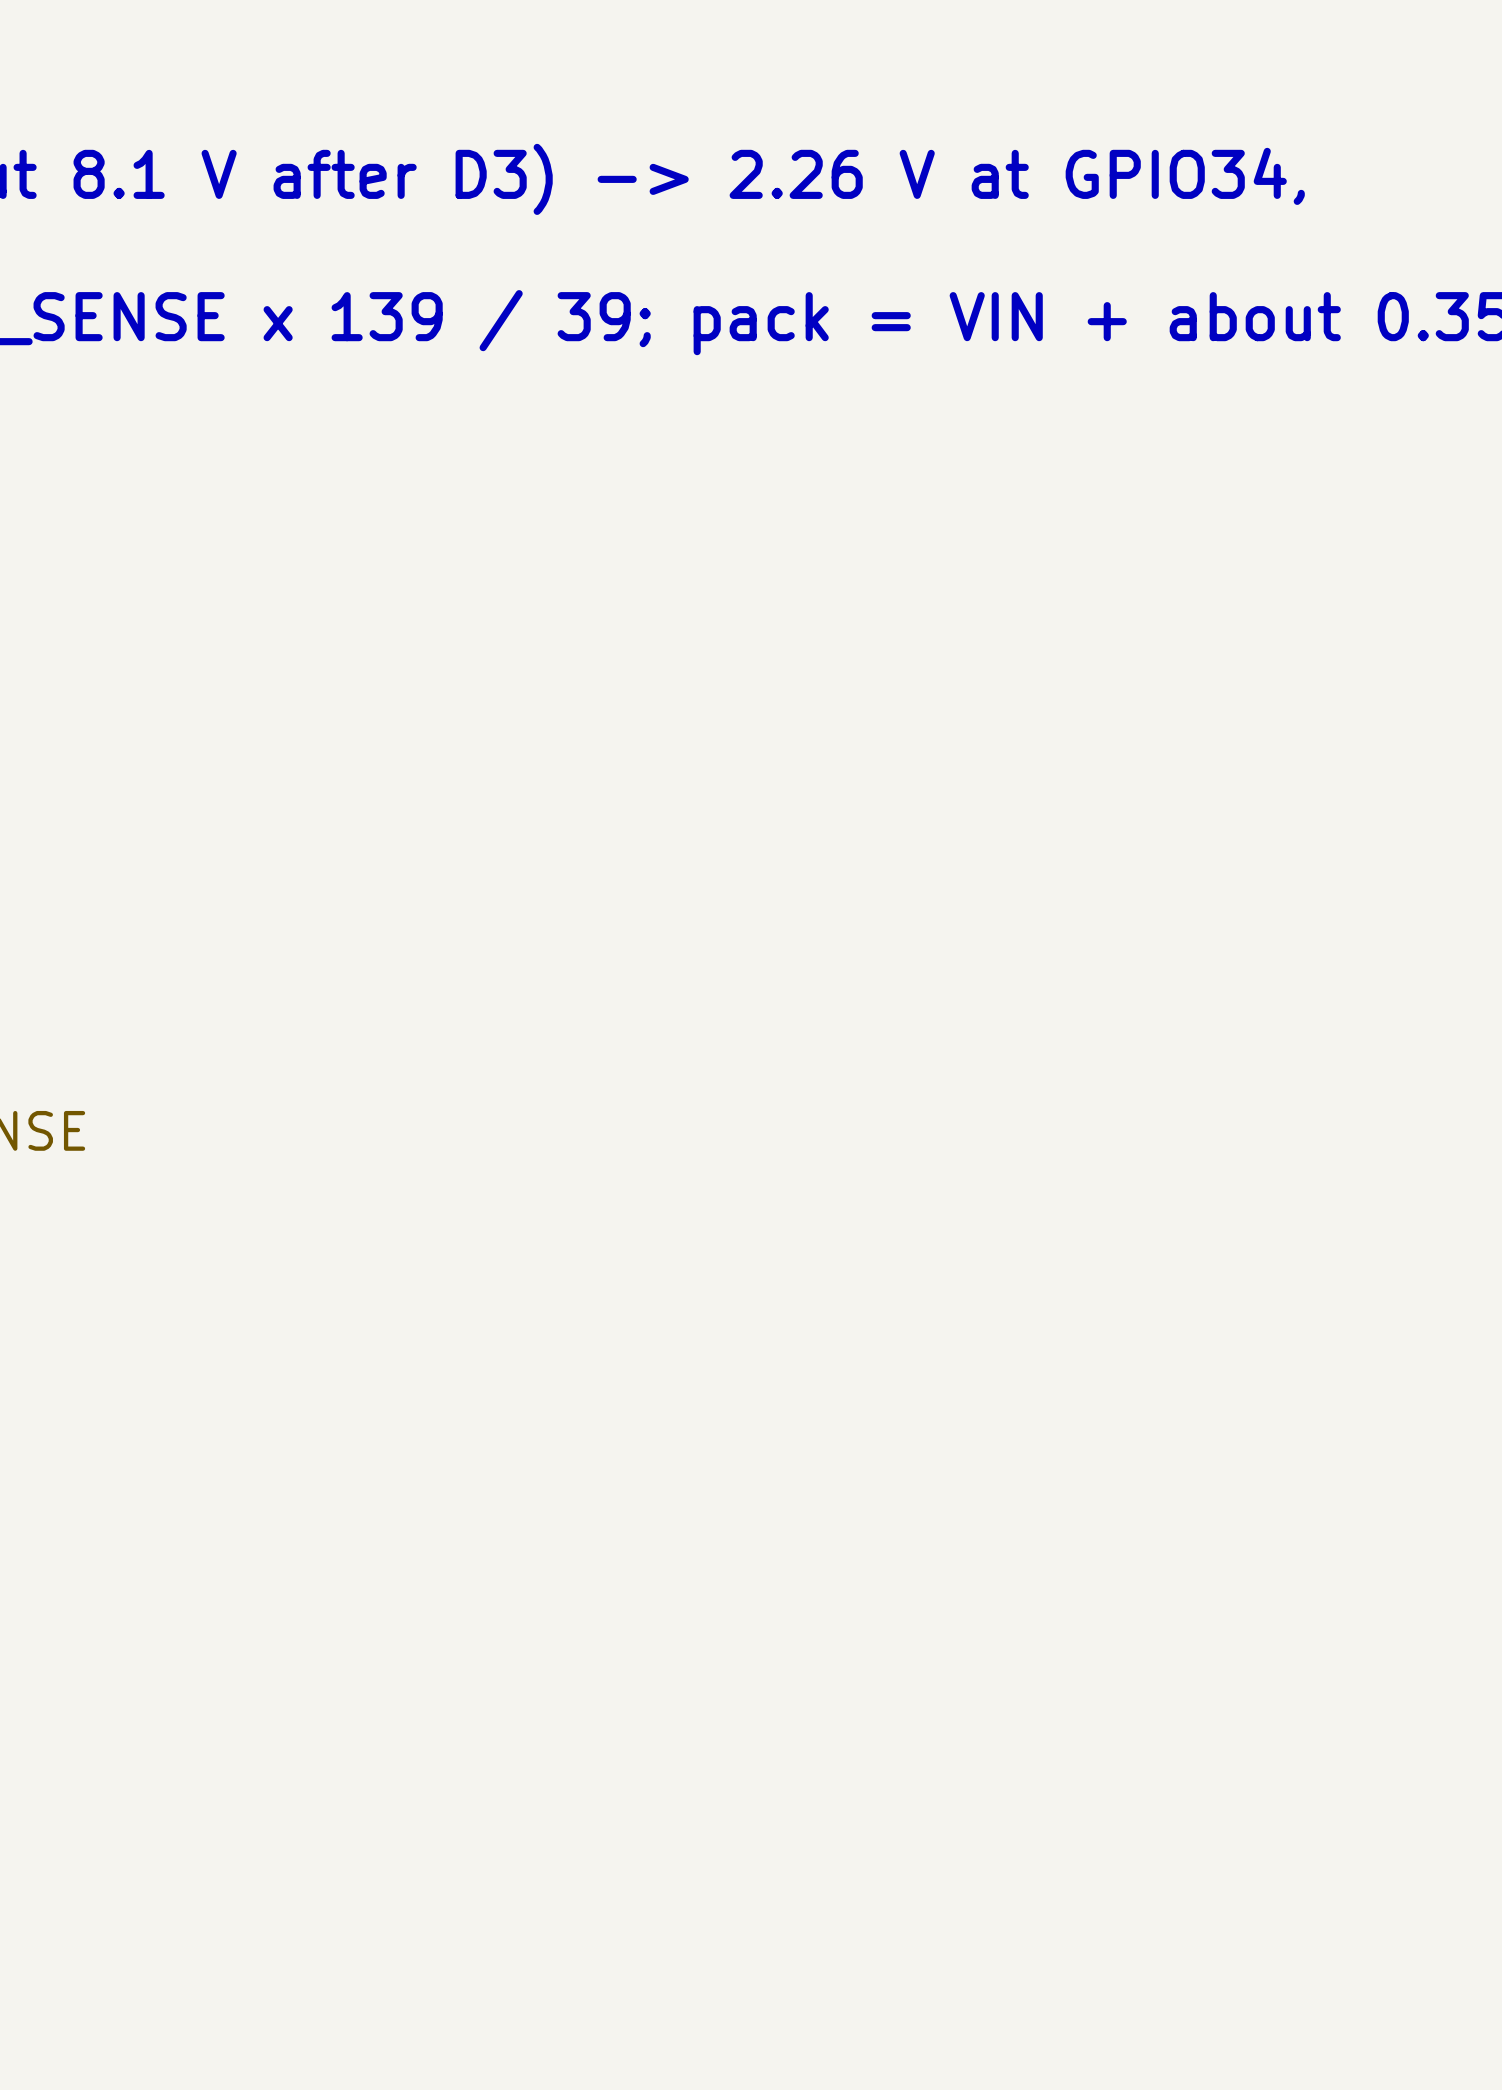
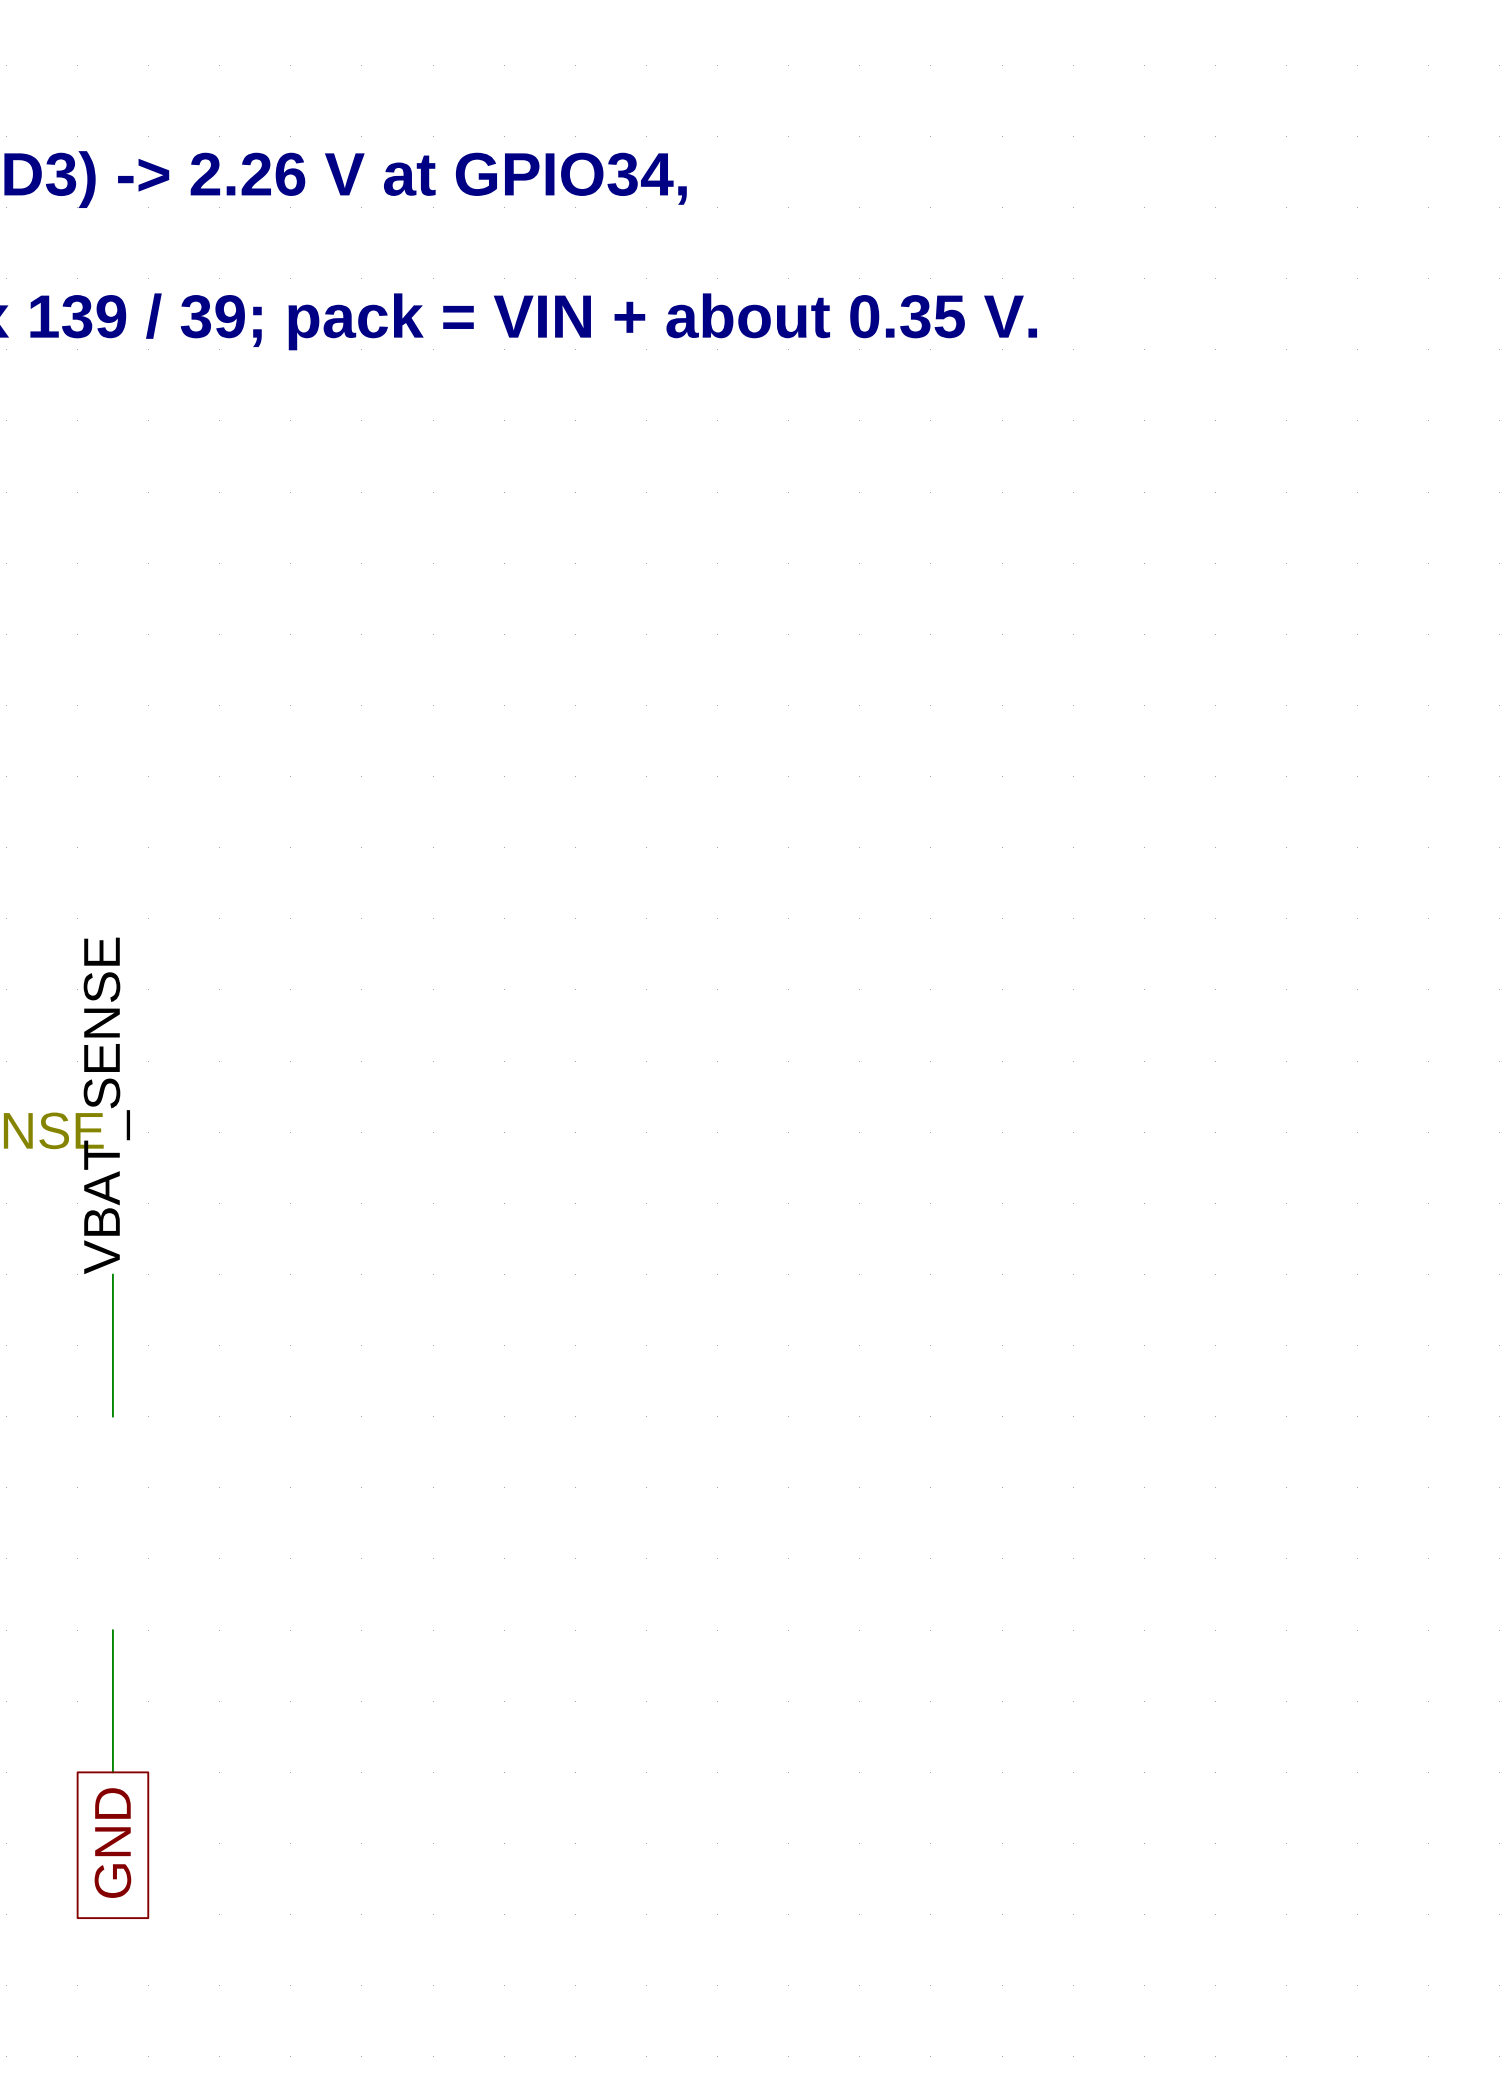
label: none -> VBAT_SENSE (106, 1105)
wire: none -> (112, 1274) (112, 1416)
wire: none -> (112, 1630) (112, 1772)
global label: none -> GND (112, 1843)

